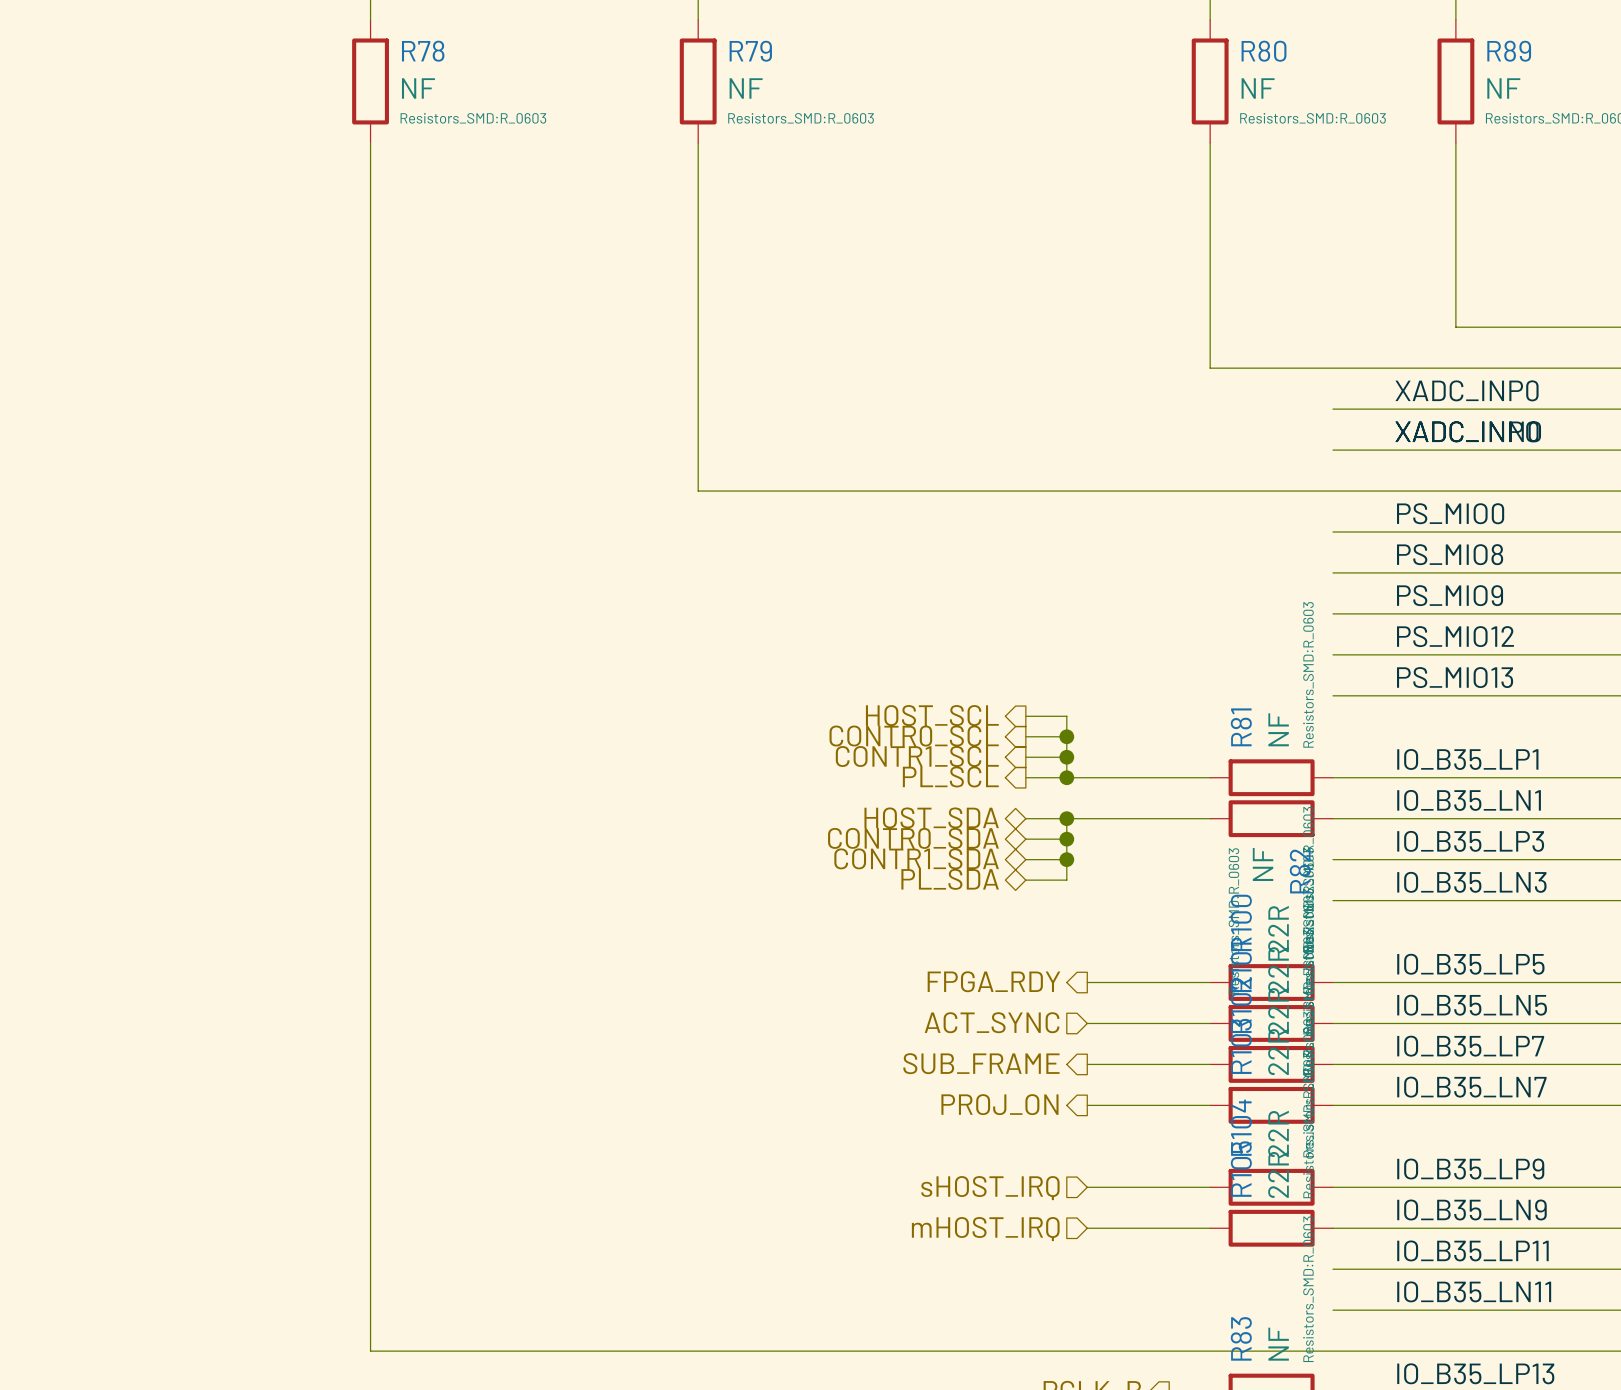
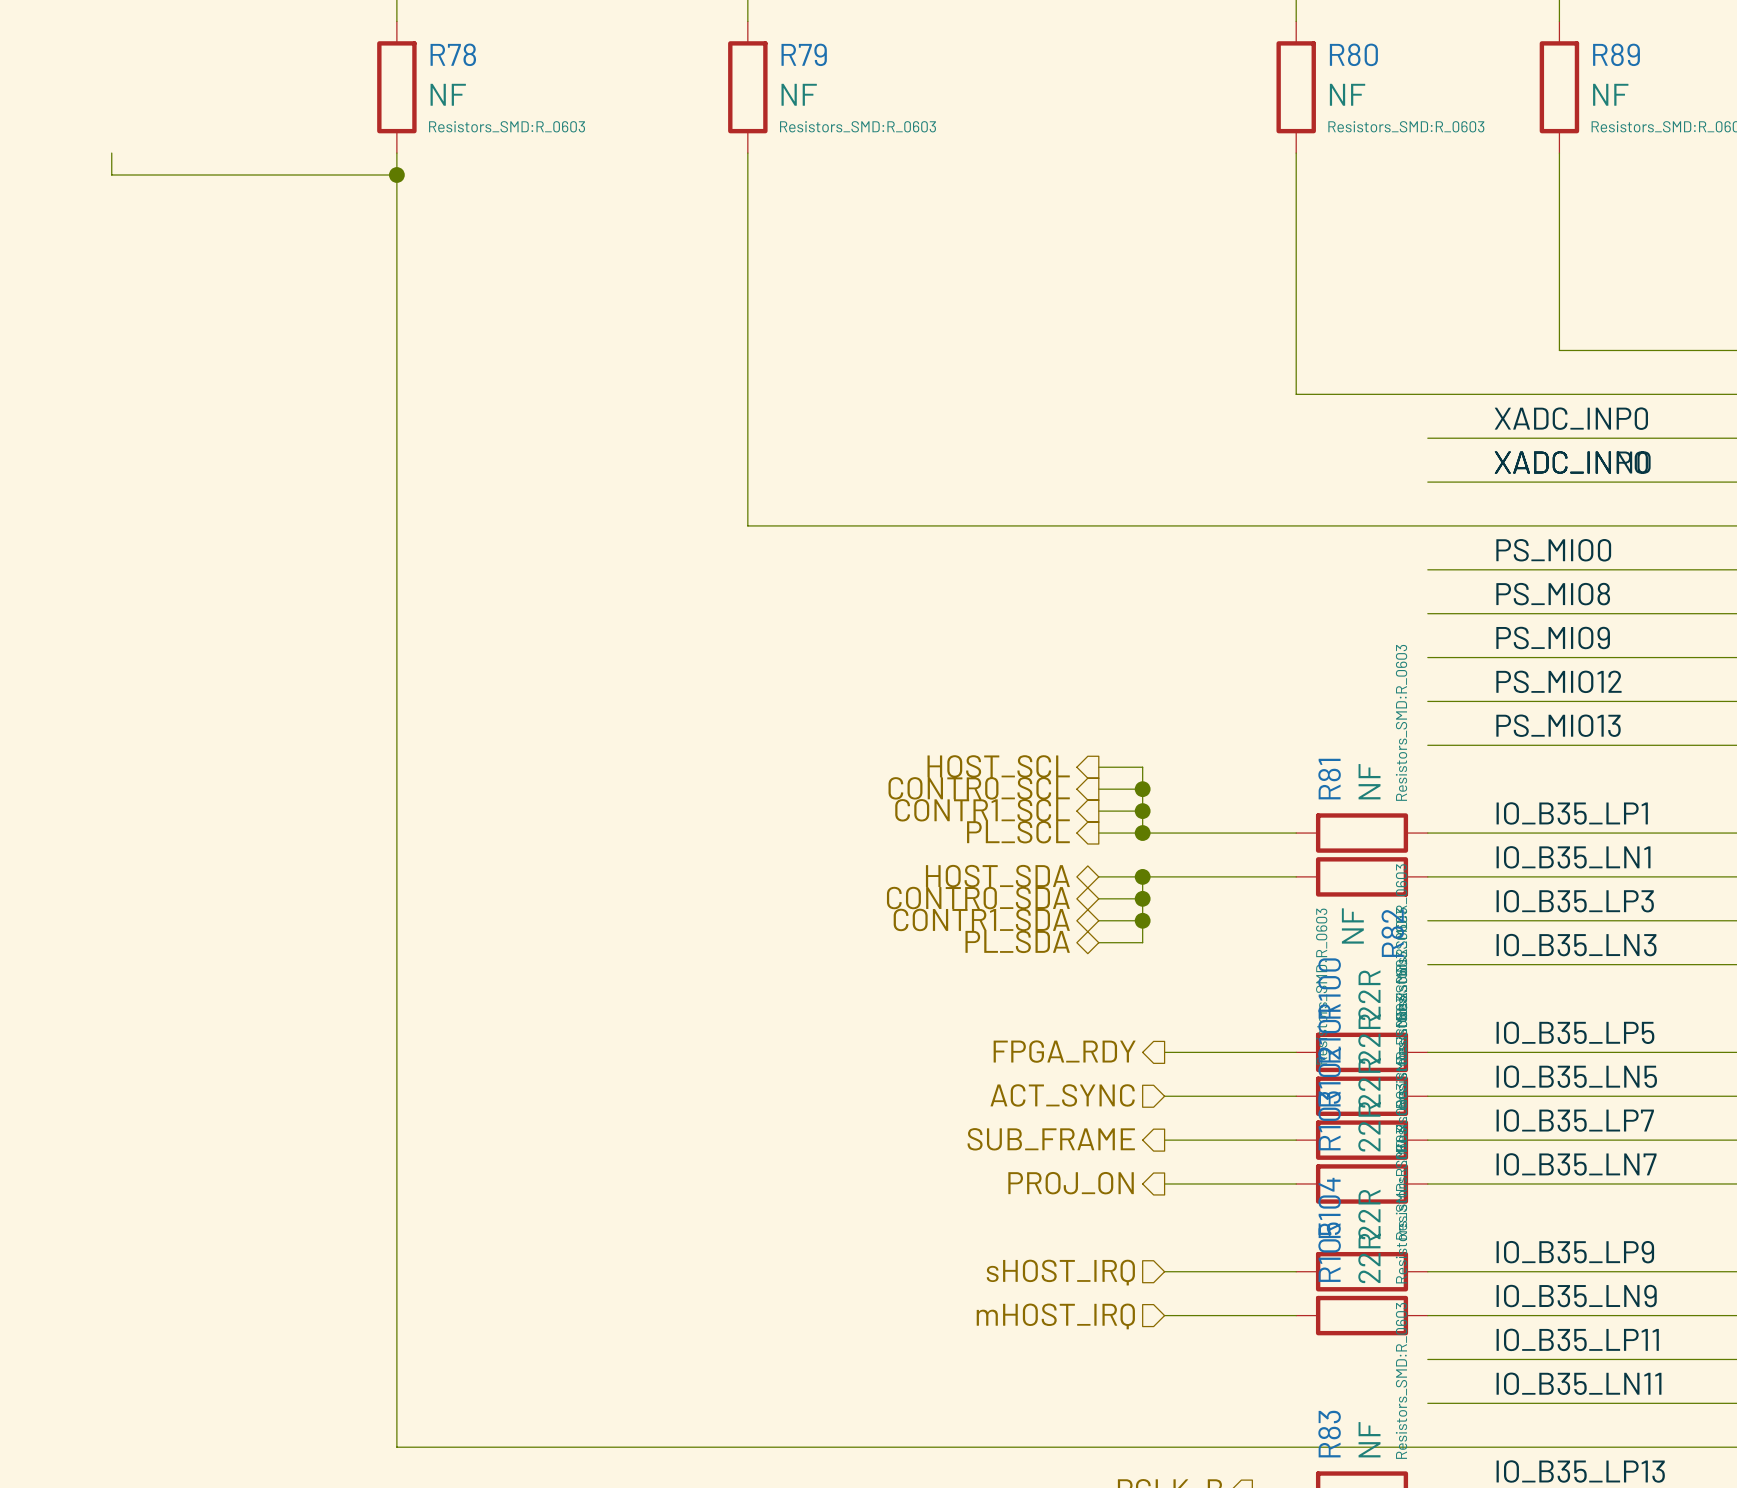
wire: none -> (111, 153) (111, 175) (396, 175)
junction: none -> (396, 175)

